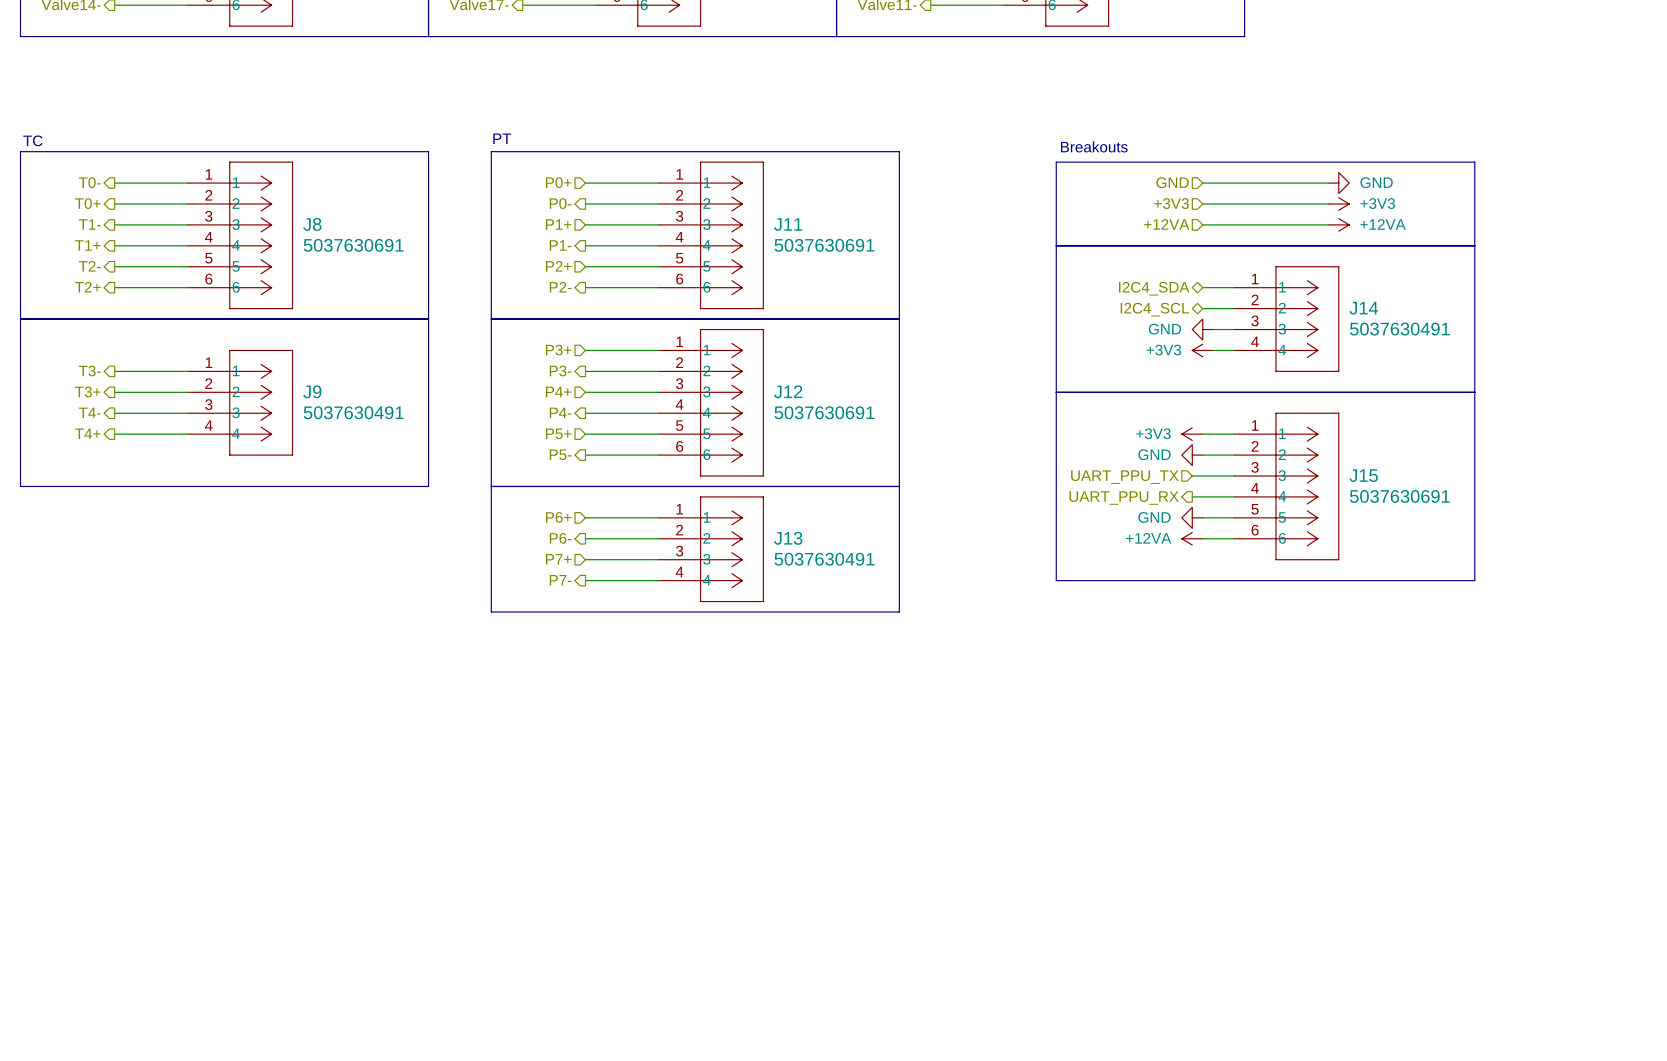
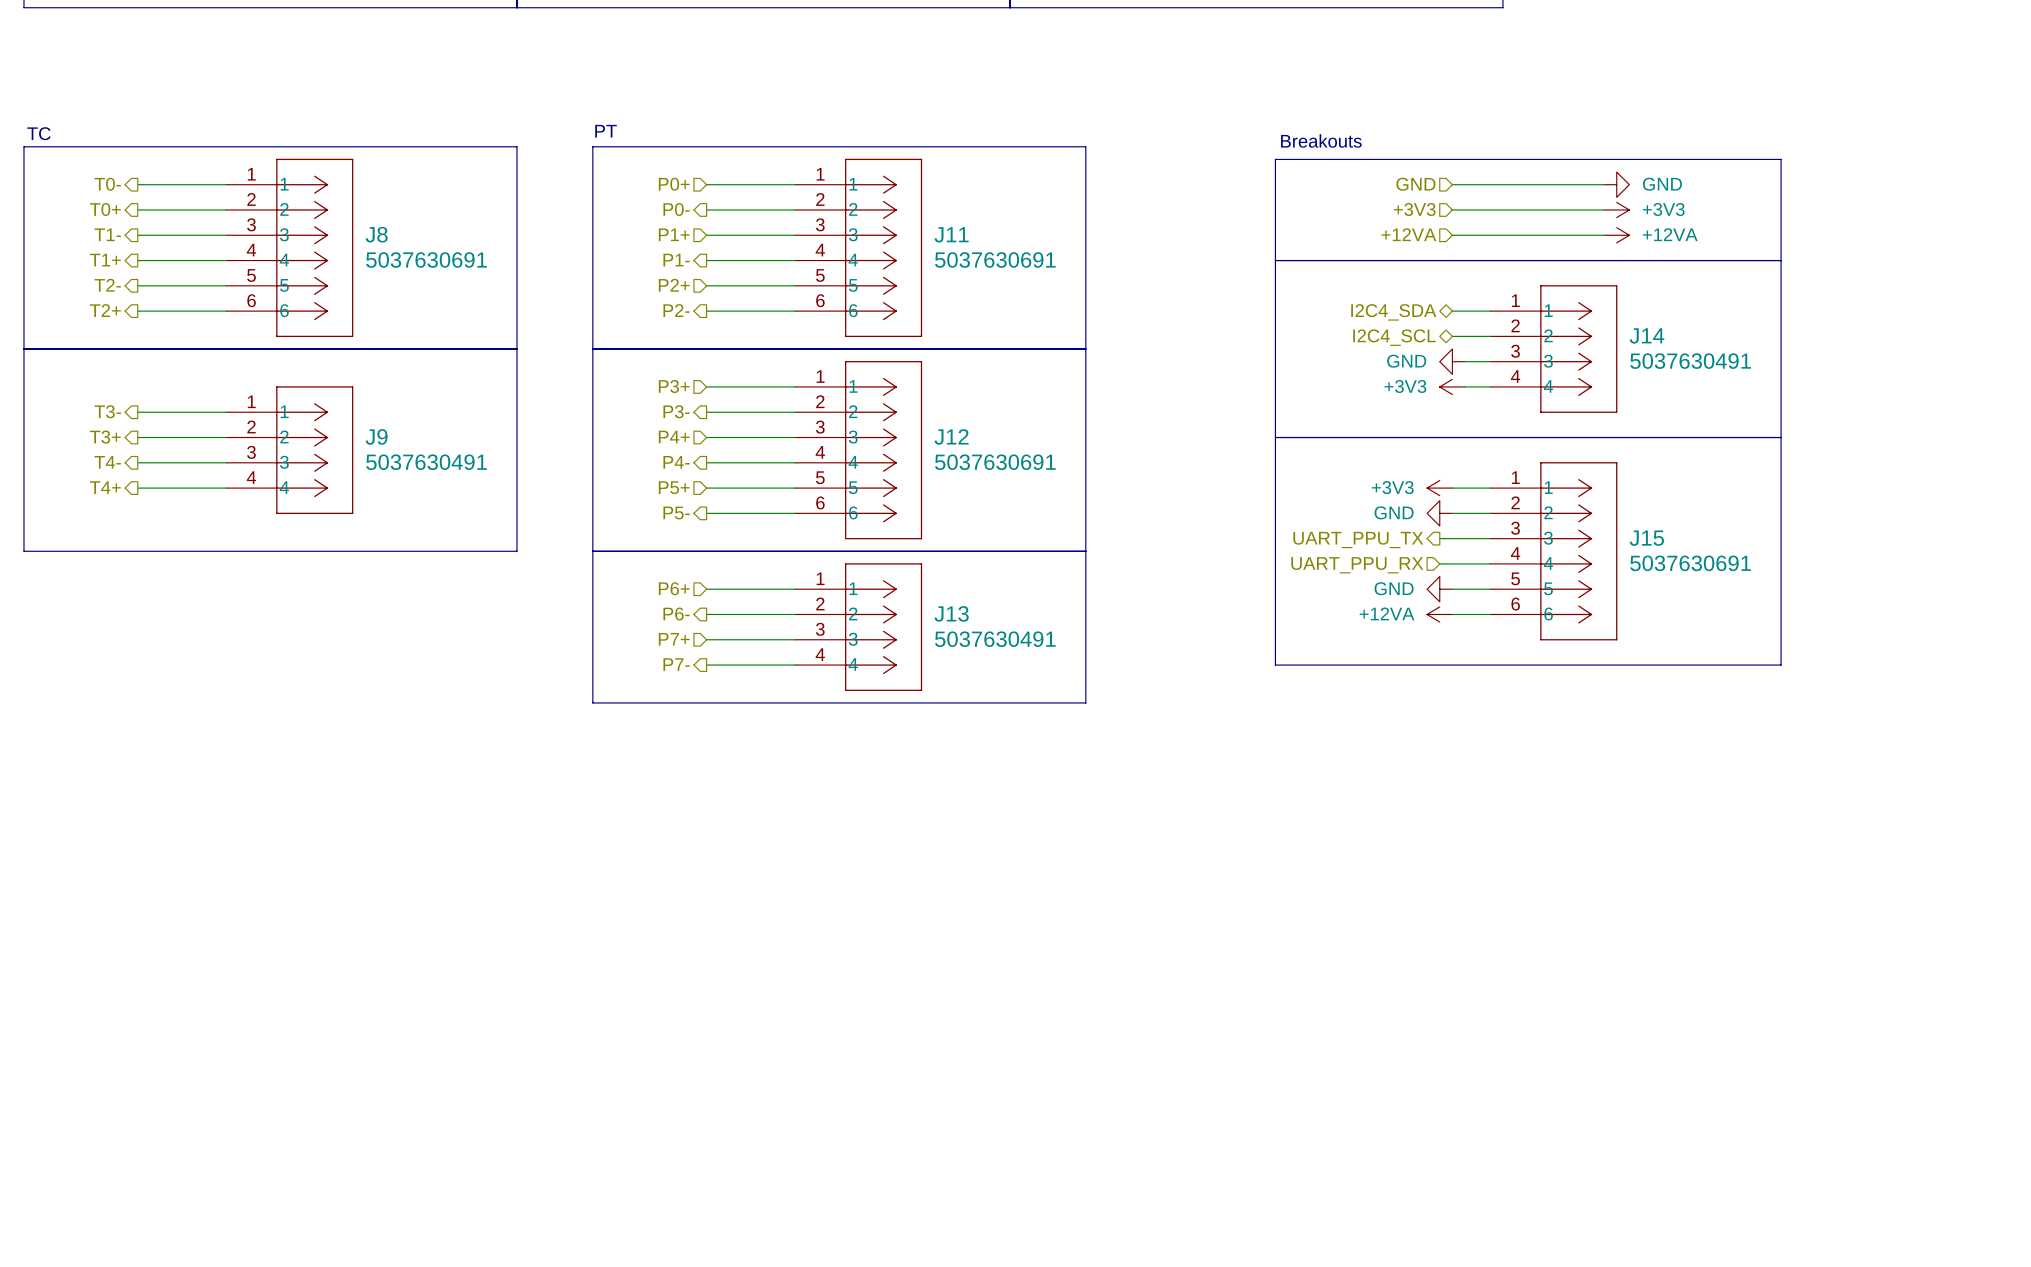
hierarchical label shape: input (1124, 477) -> output (1358, 540)
hierarchical label shape: output (1124, 498) -> input (1357, 565)

